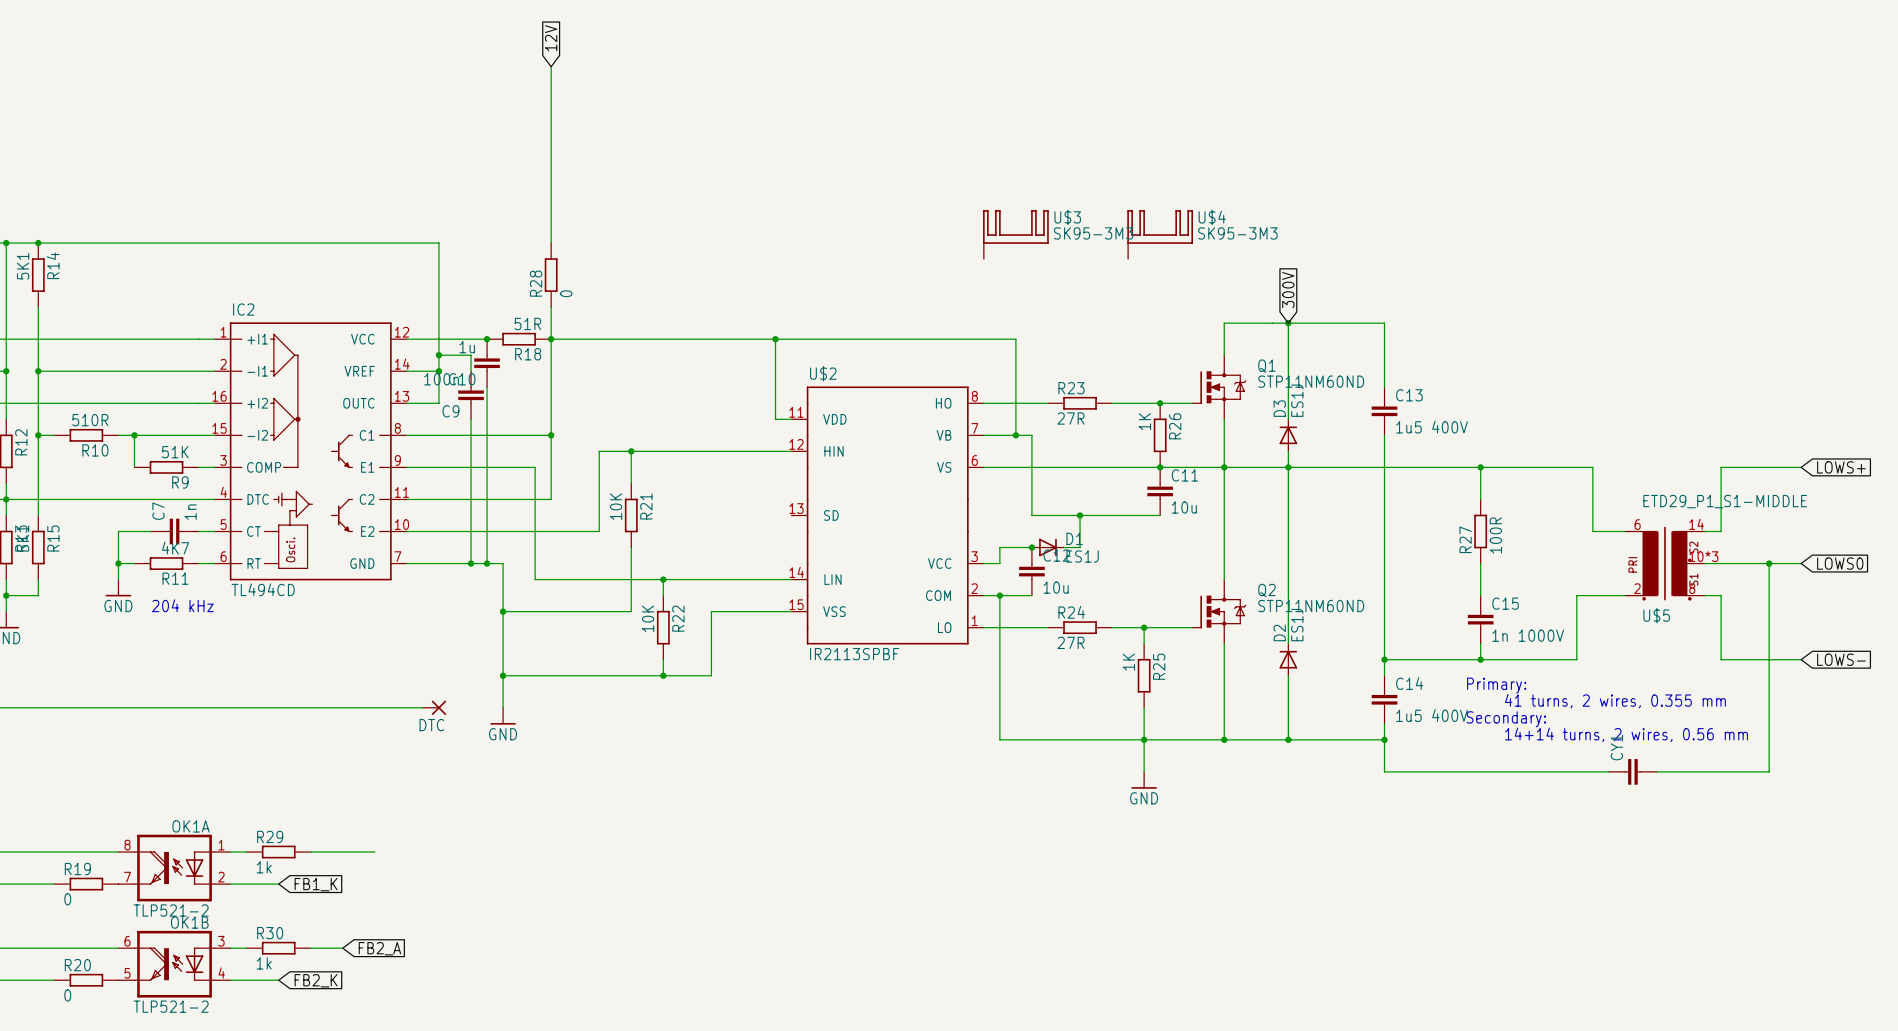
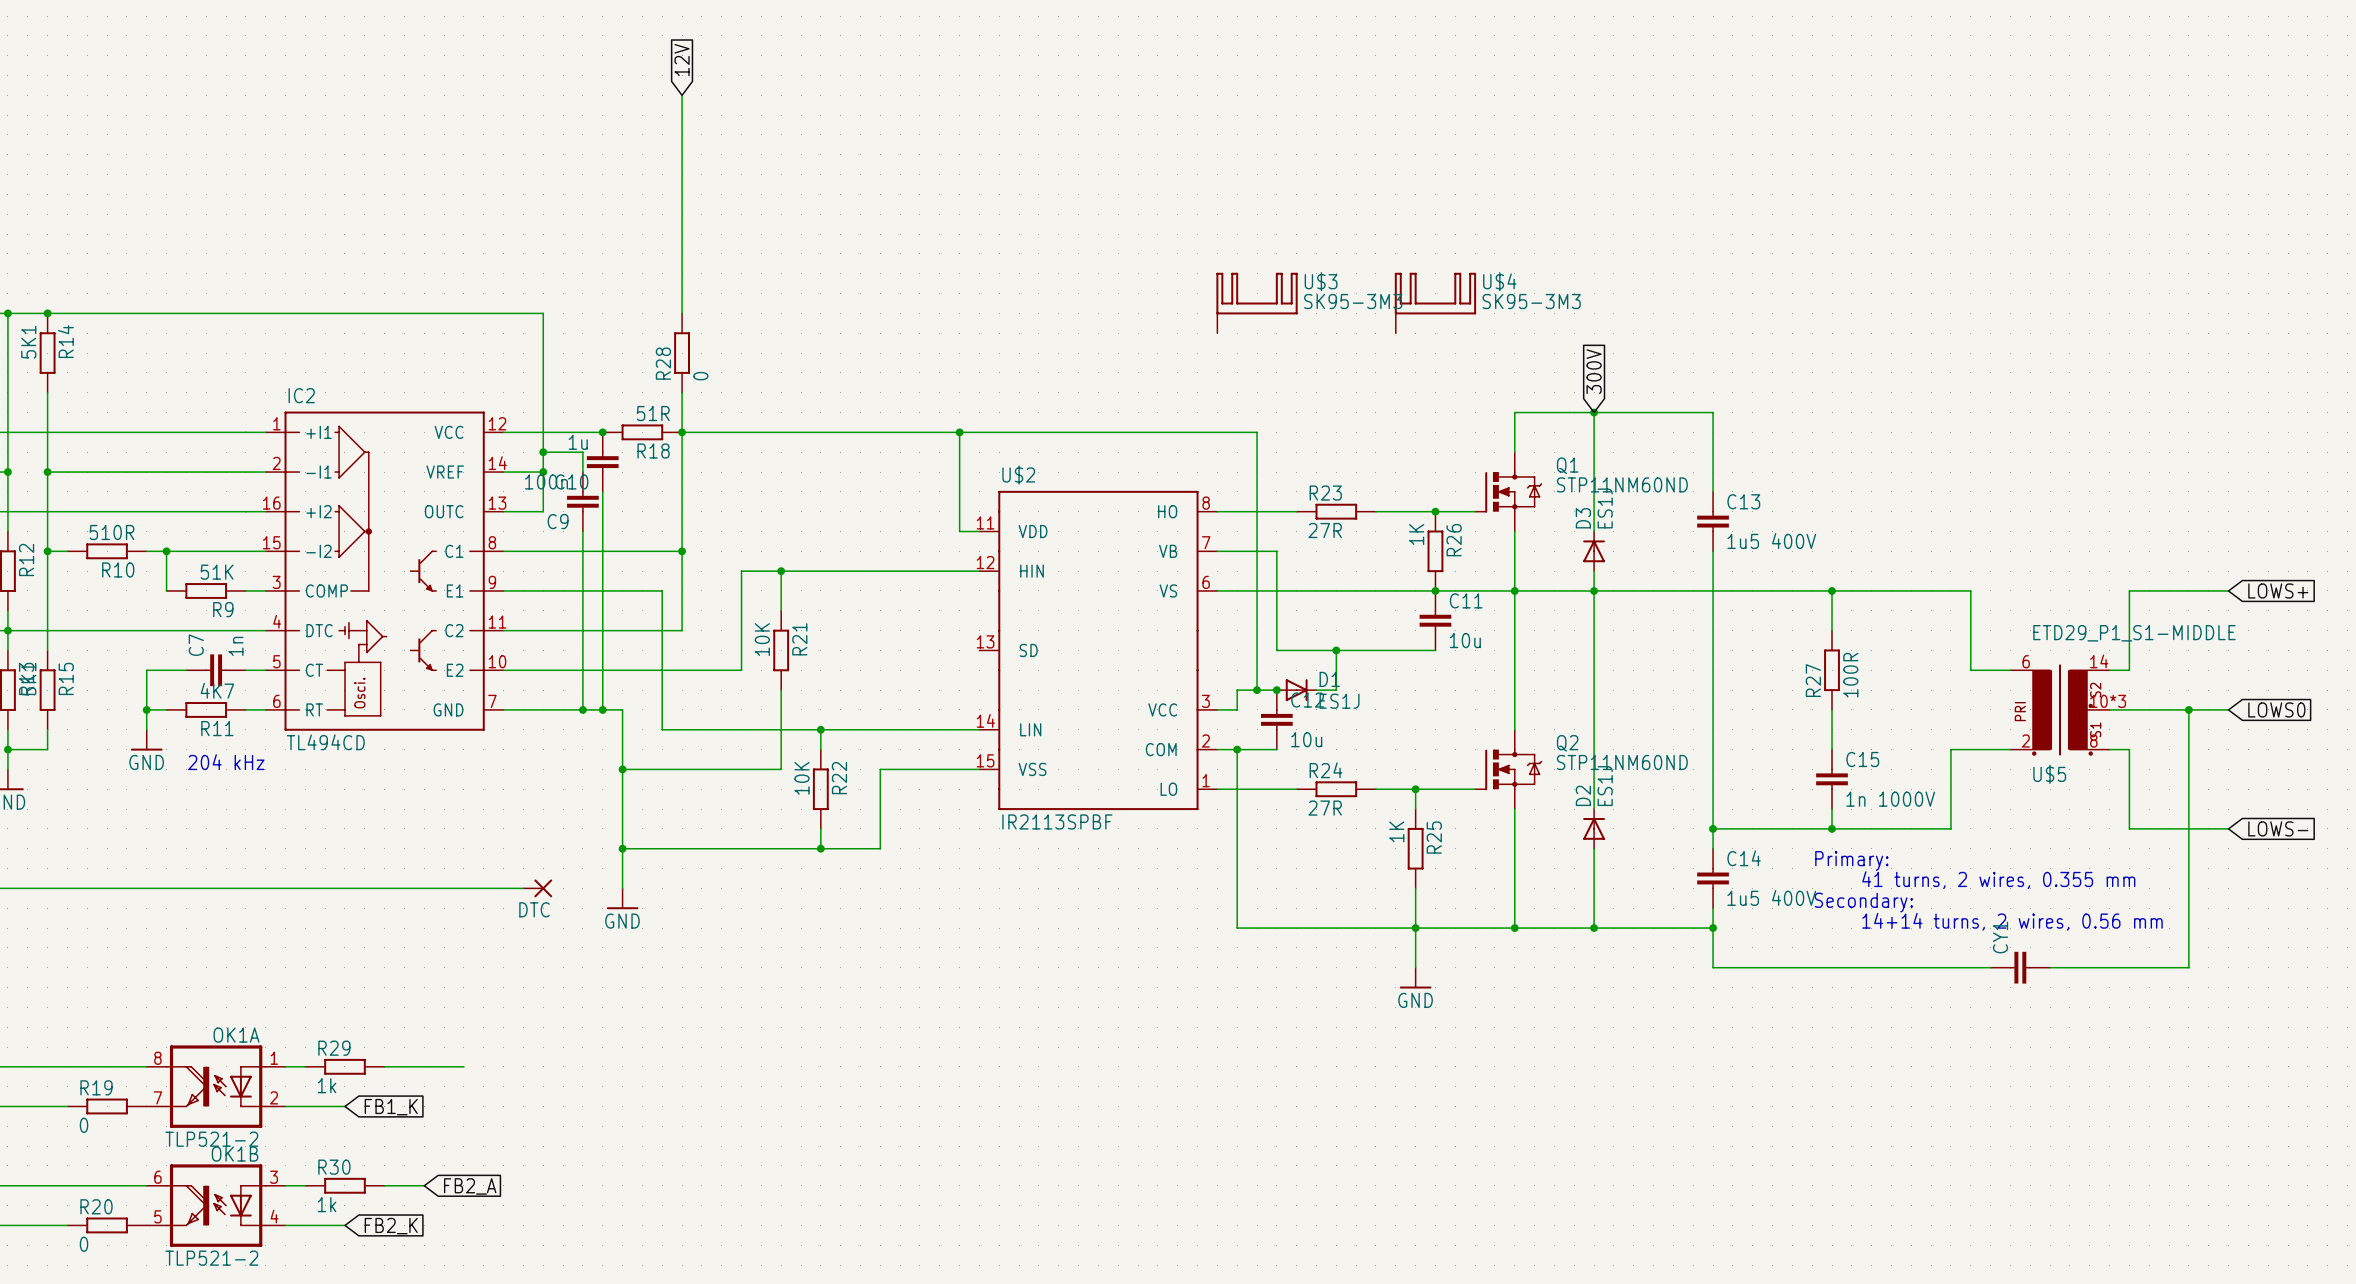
wire: none -> (1257, 551) (1257, 690)
junction: (1015, 435) -> none
junction: none -> (1257, 690)

